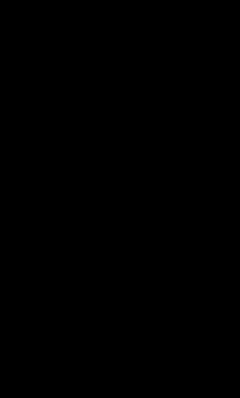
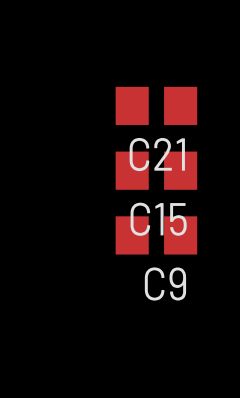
C21: none -> (156, 105)
C15: none -> (156, 170)
C9: none -> (156, 235)

